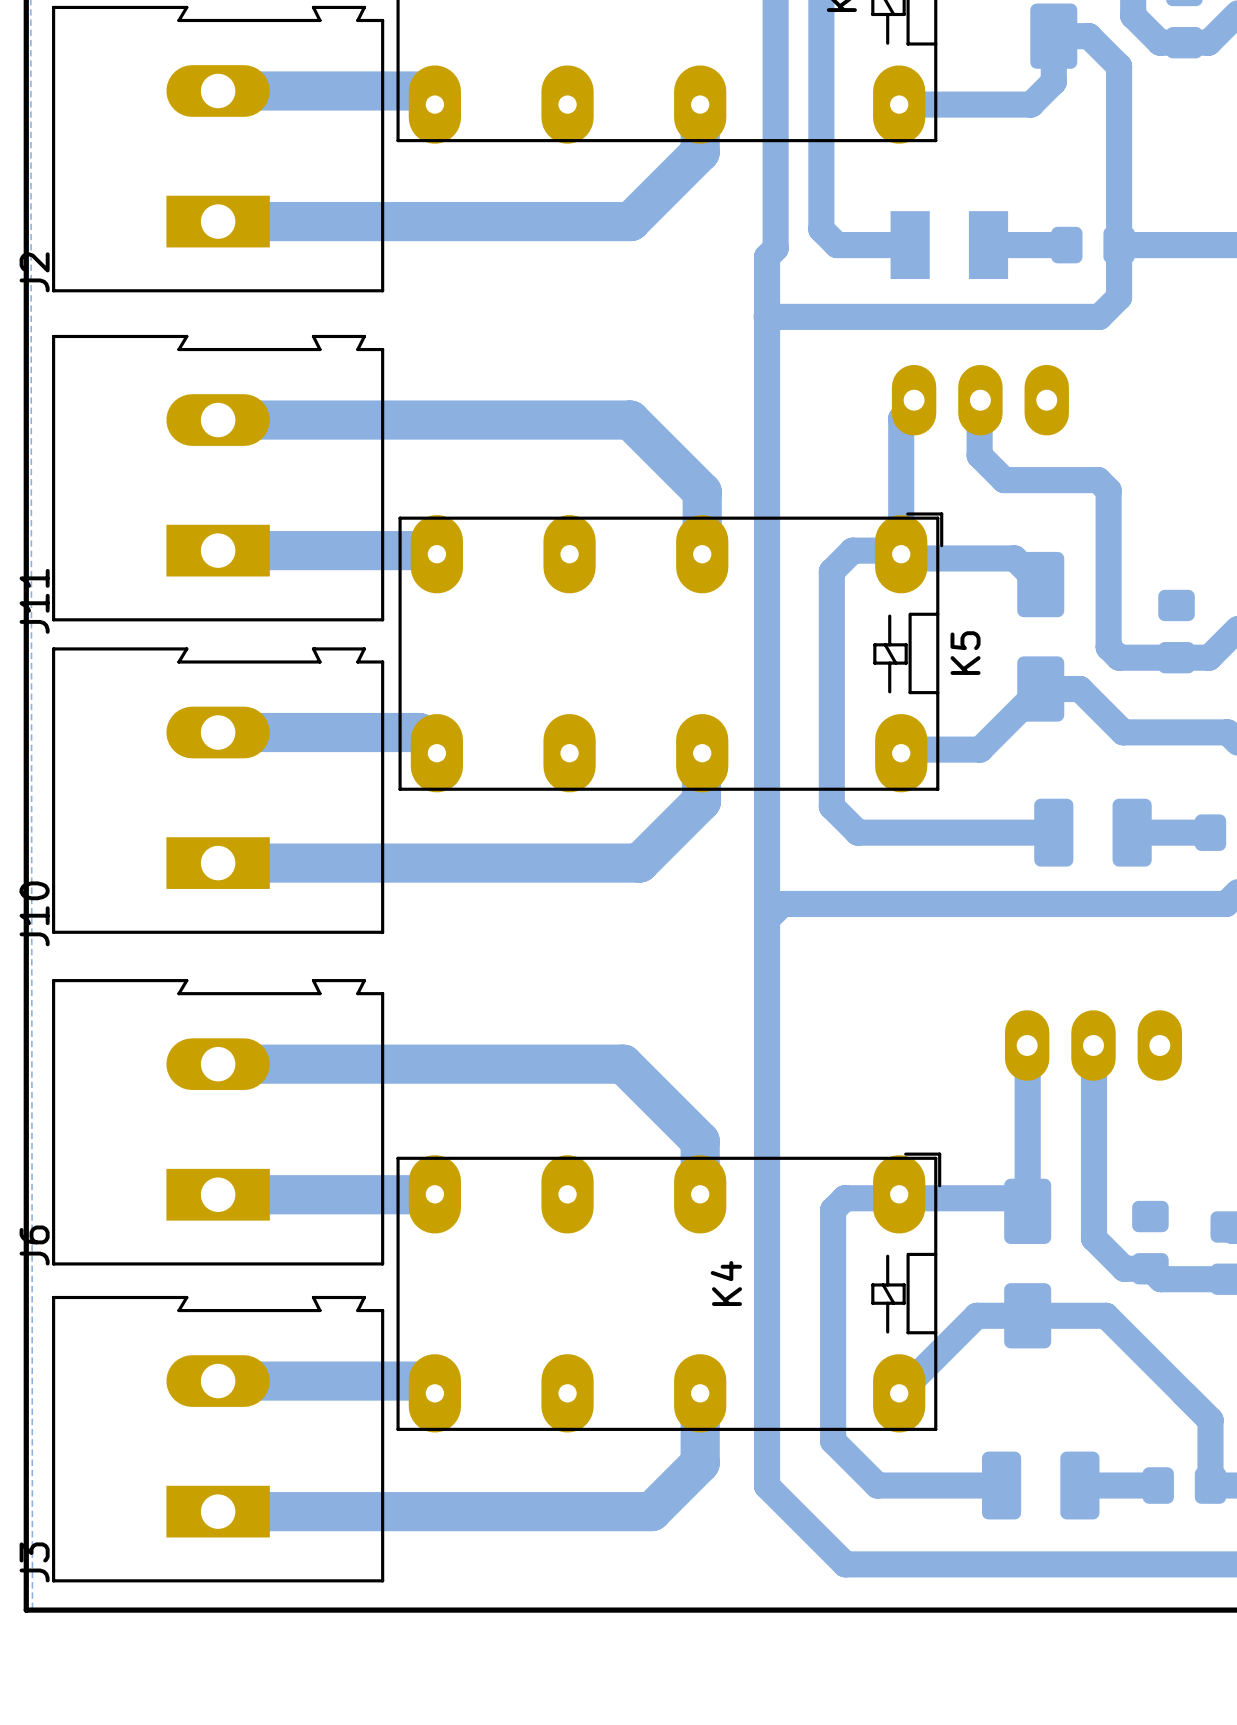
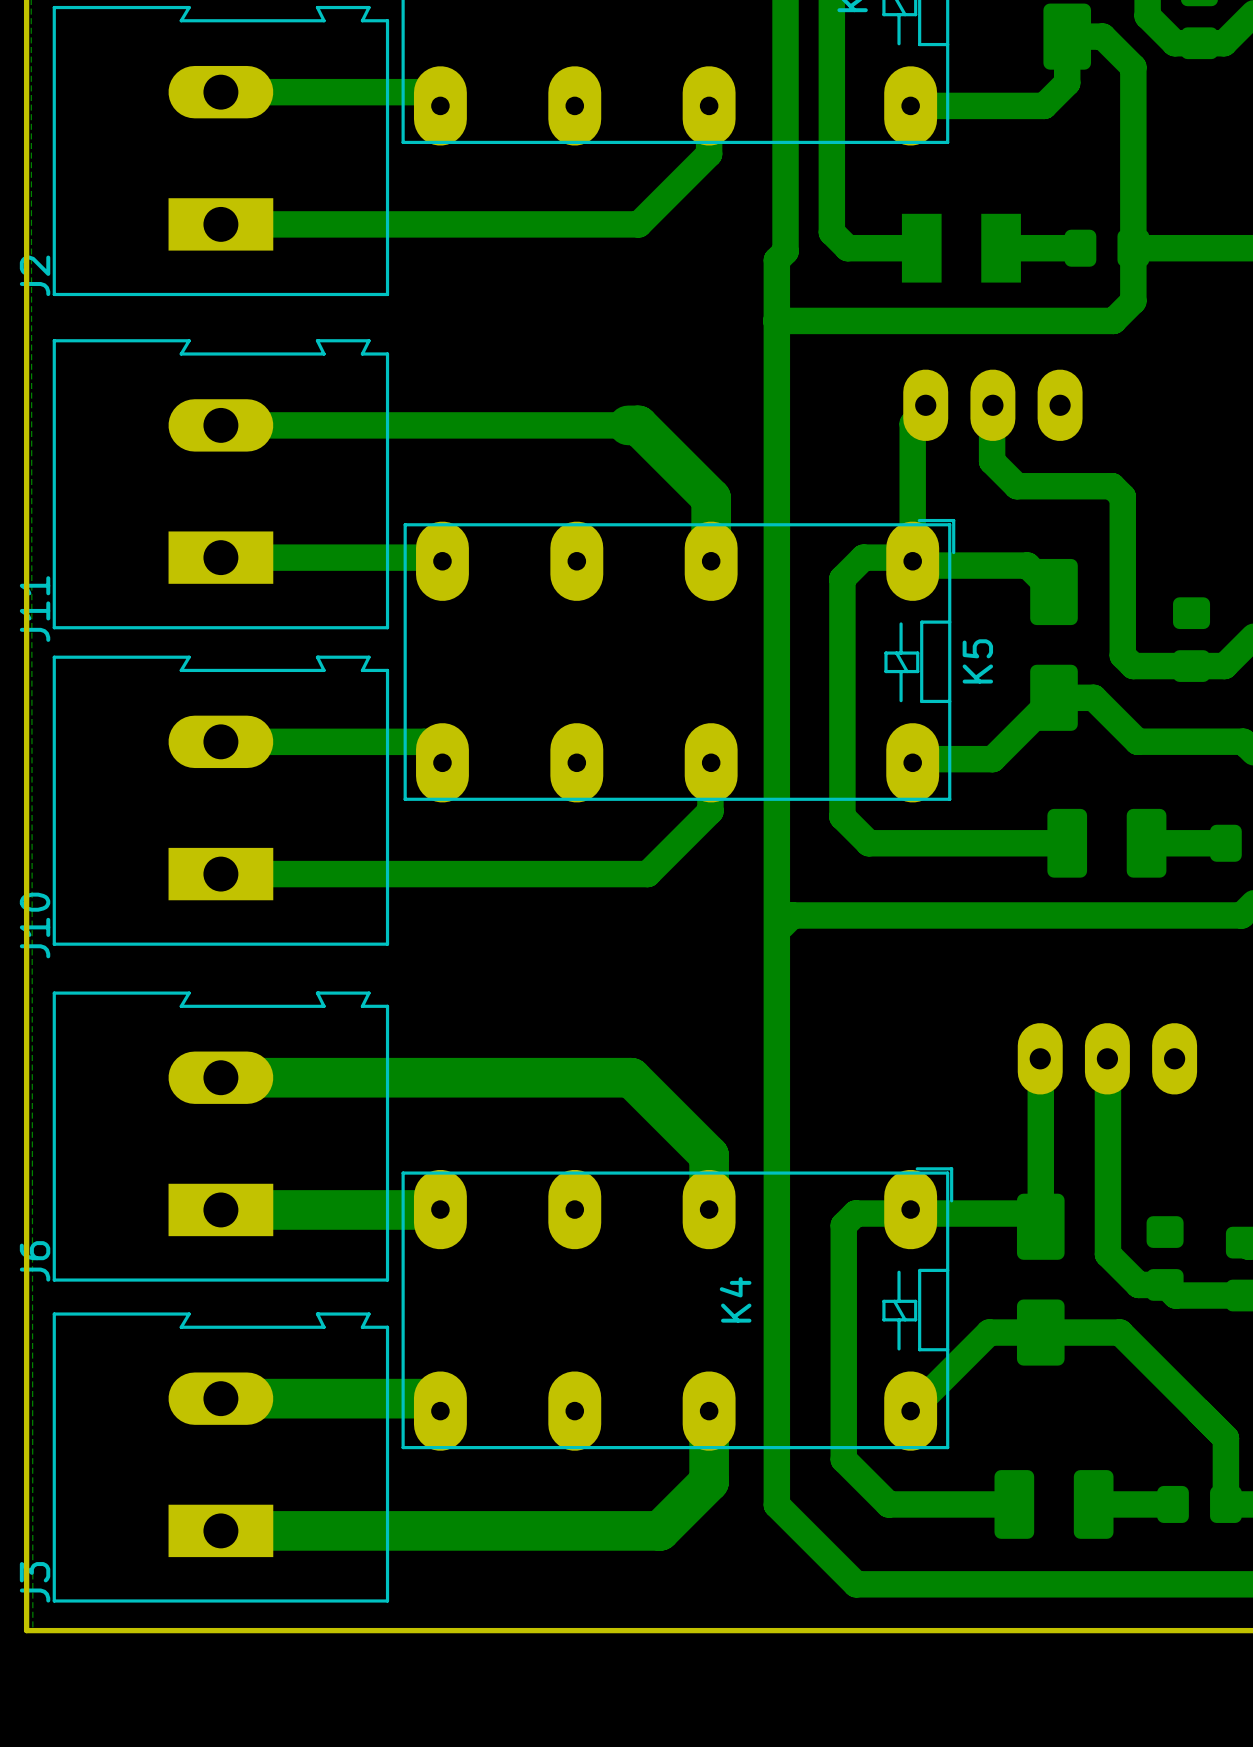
bottom track width: thick (218, 91) (421, 91) -> thin (220, 92) (426, 92)
bottom track width: thick (700, 104) (700, 152) (630, 221) (218, 221) -> thin (709, 105) (709, 154) (638, 224) (220, 224)
bottom track width: thick (218, 420) (620, 420) -> thin (220, 425) (628, 425)
bottom track width: thick (218, 550) (436, 550) -> thin (220, 557) (441, 557)
bottom track width: thick (218, 732) (419, 732) (436, 749) -> thin (220, 741) (424, 741) (441, 759)
bottom track width: thick (701, 749) (701, 801) (639, 863) (218, 863) -> thin (710, 759) (710, 811) (647, 874) (220, 874)

